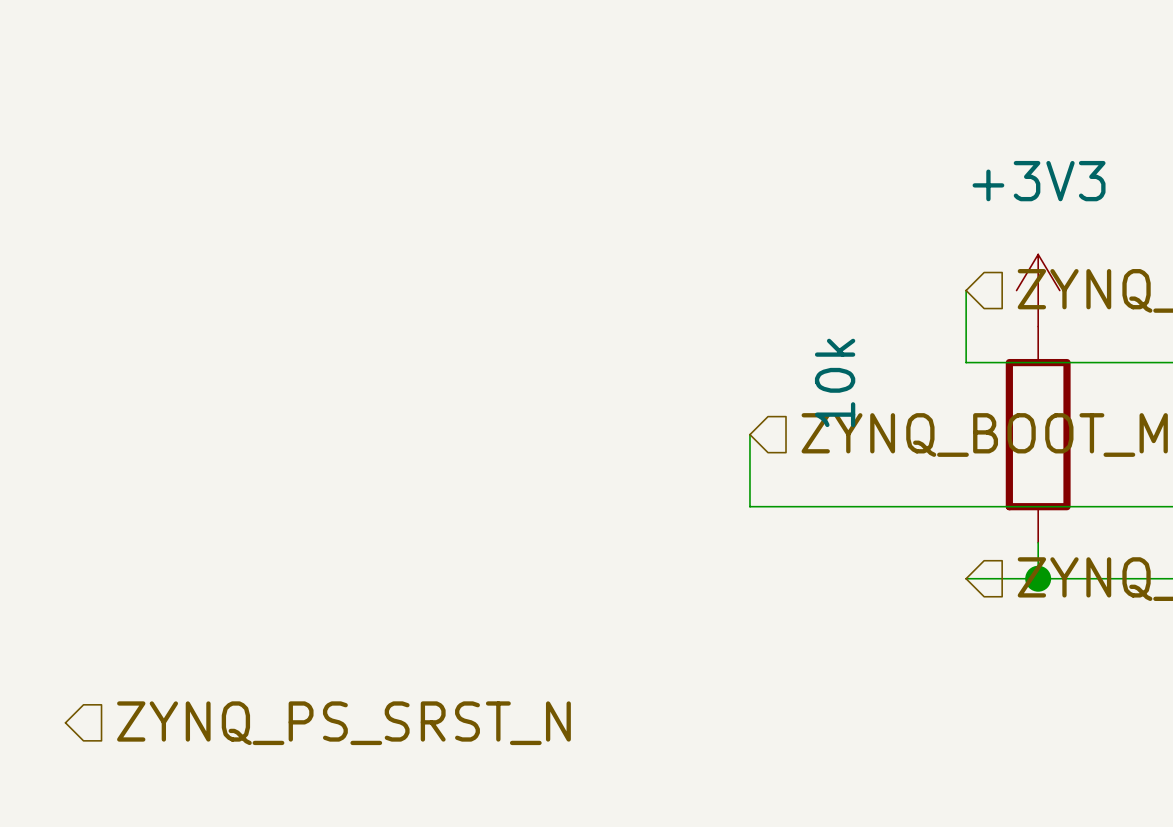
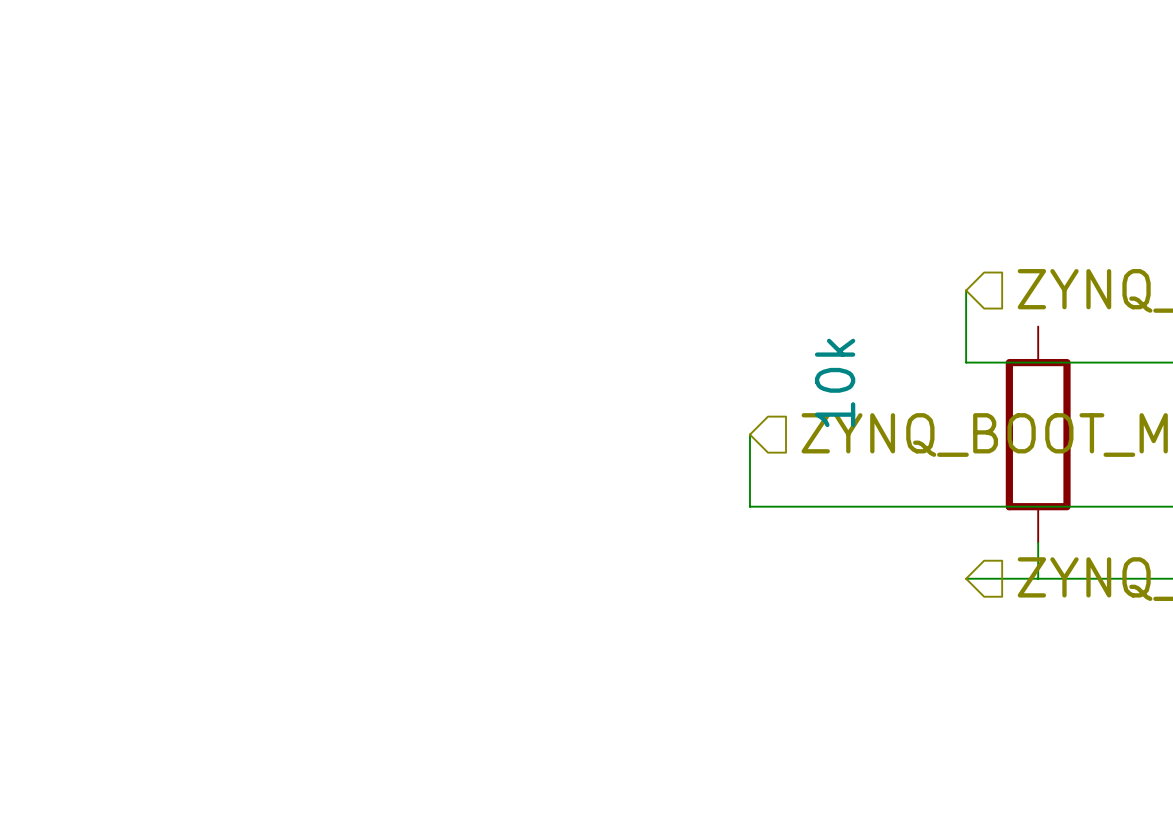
power symbol: +3V3 (1038, 290) -> none
junction: (1038, 578) -> none
hierarchical label: ZYNQ_PS_SRST_N (343, 723) -> none

